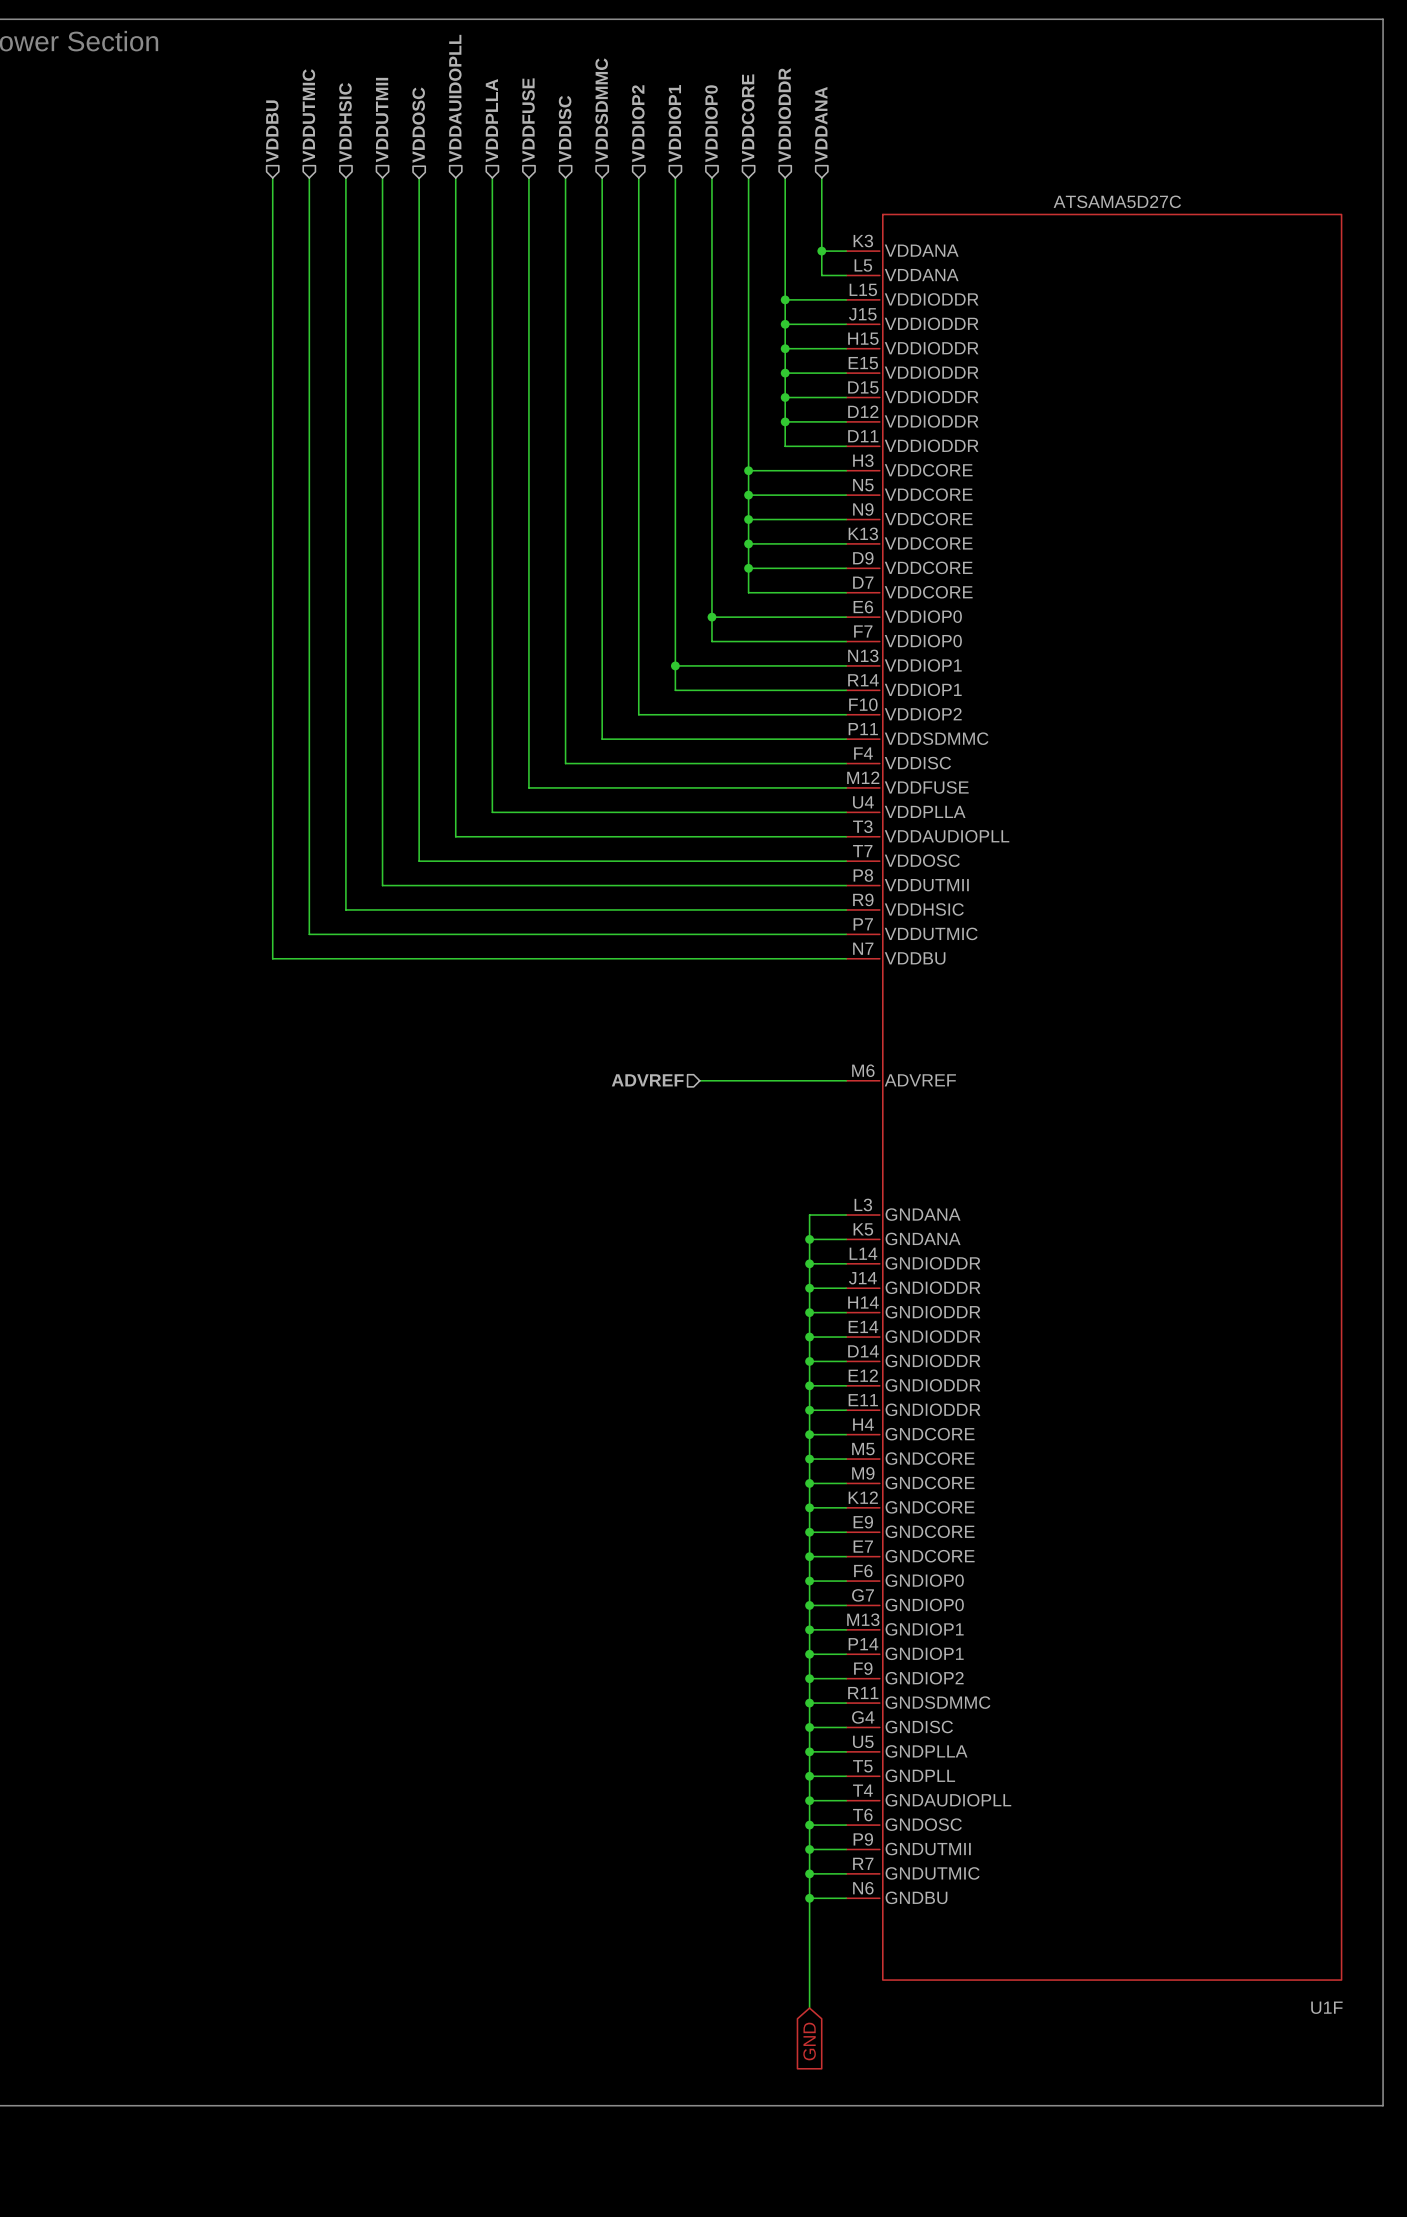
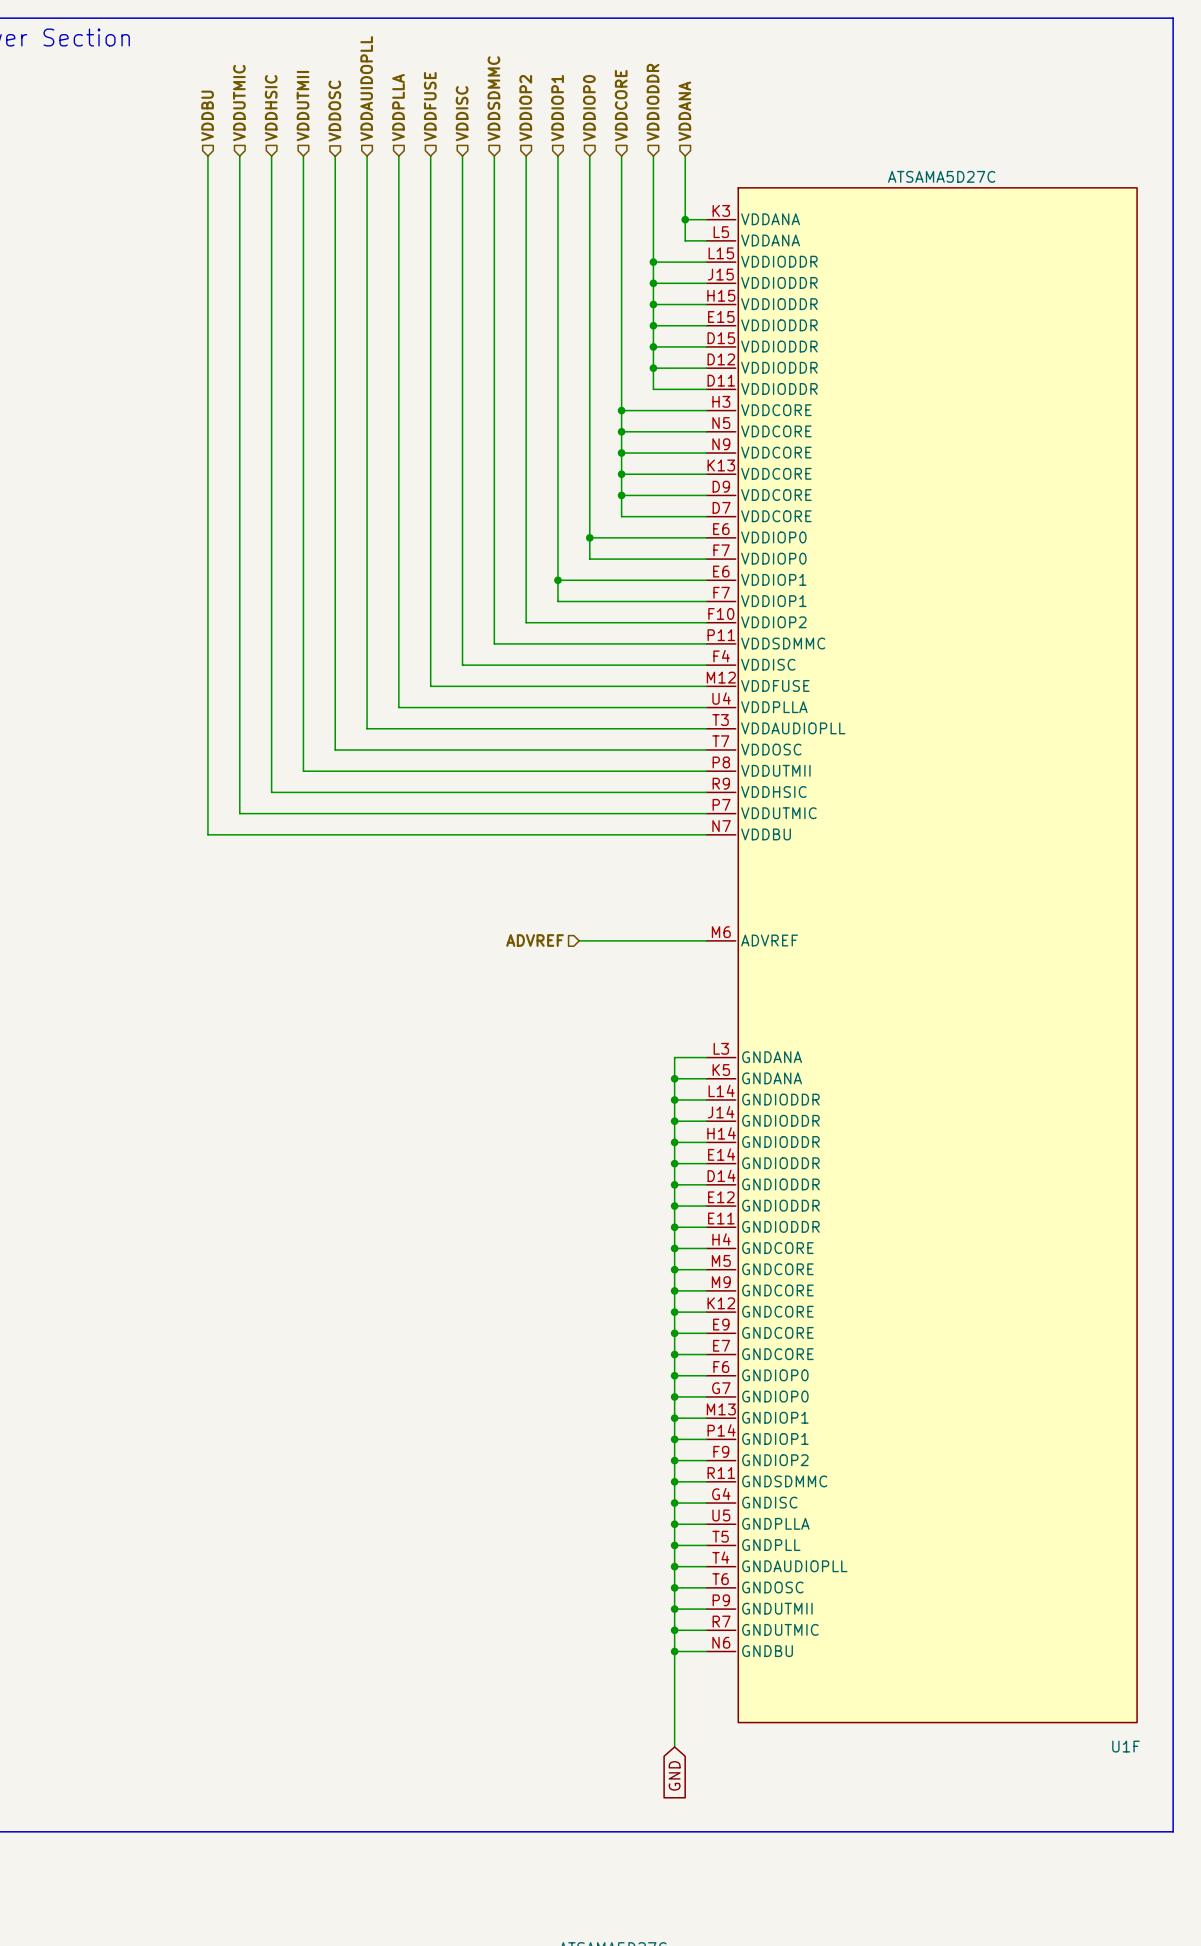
U1F pin number: N13 (863, 655) -> E6 (721, 571)
U1F pin number: R14 (863, 680) -> F7 (721, 592)

